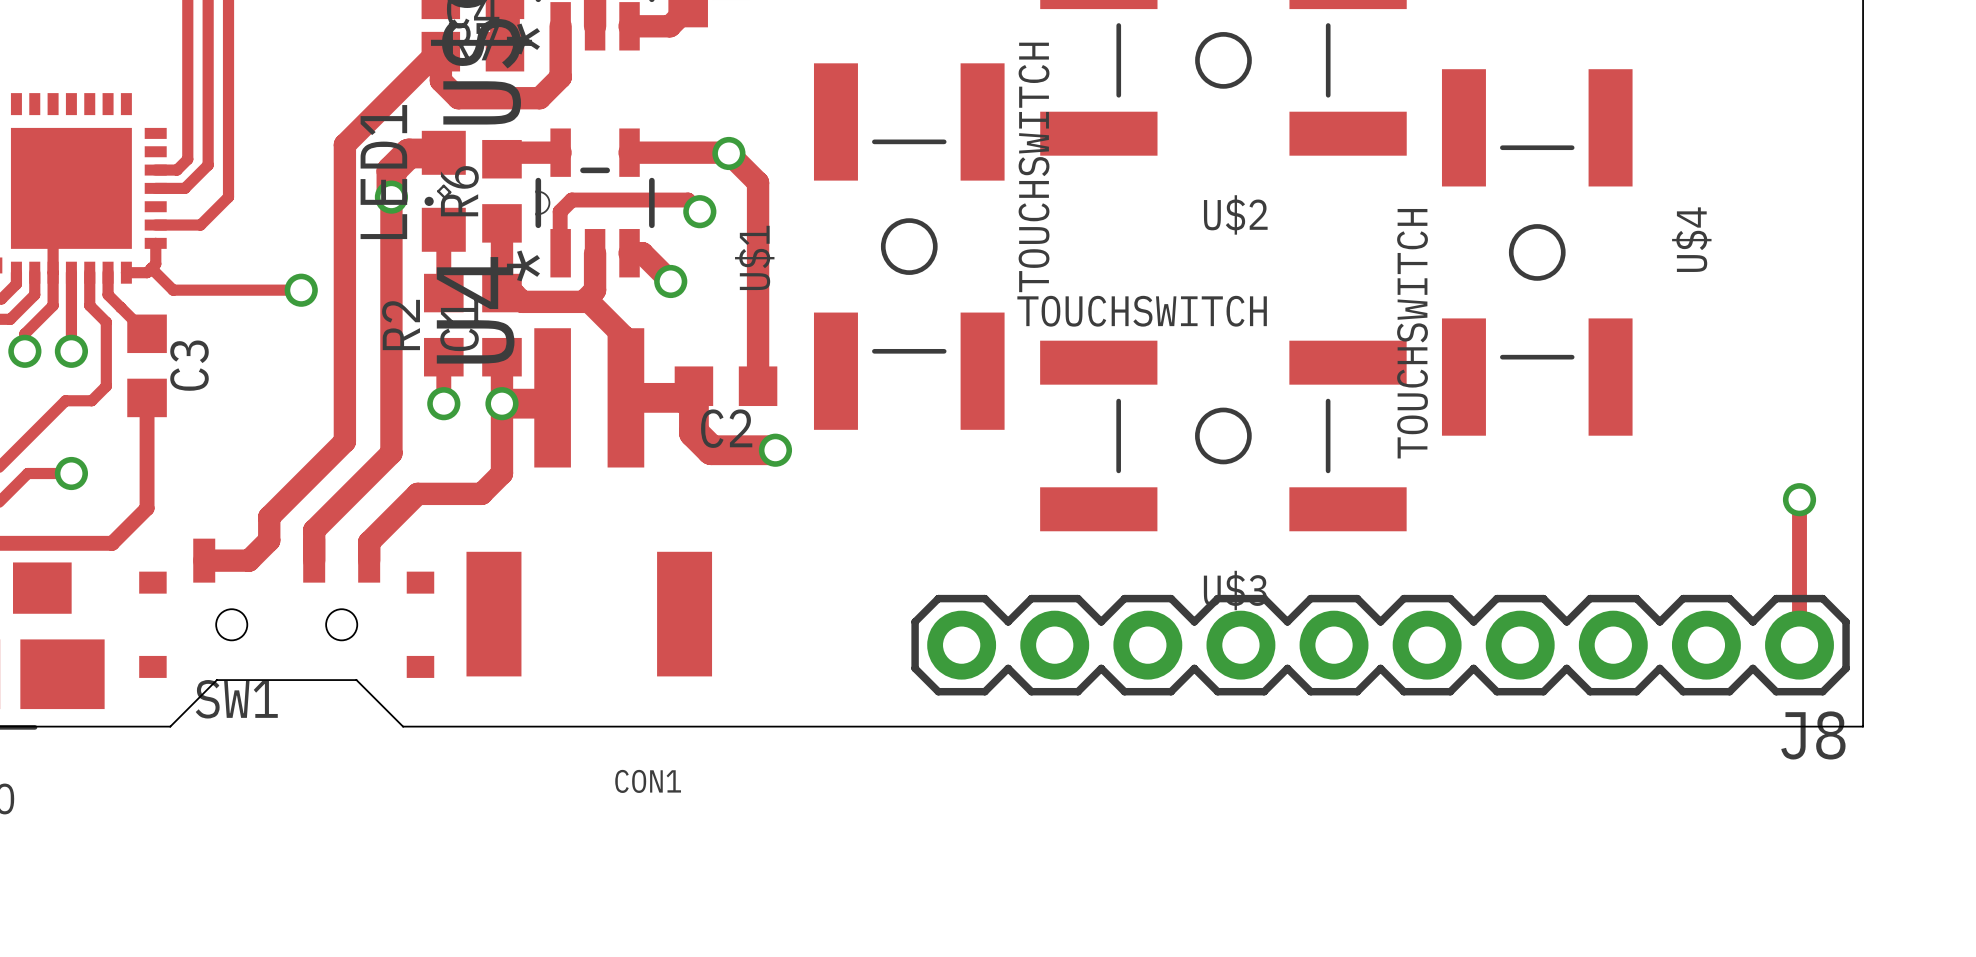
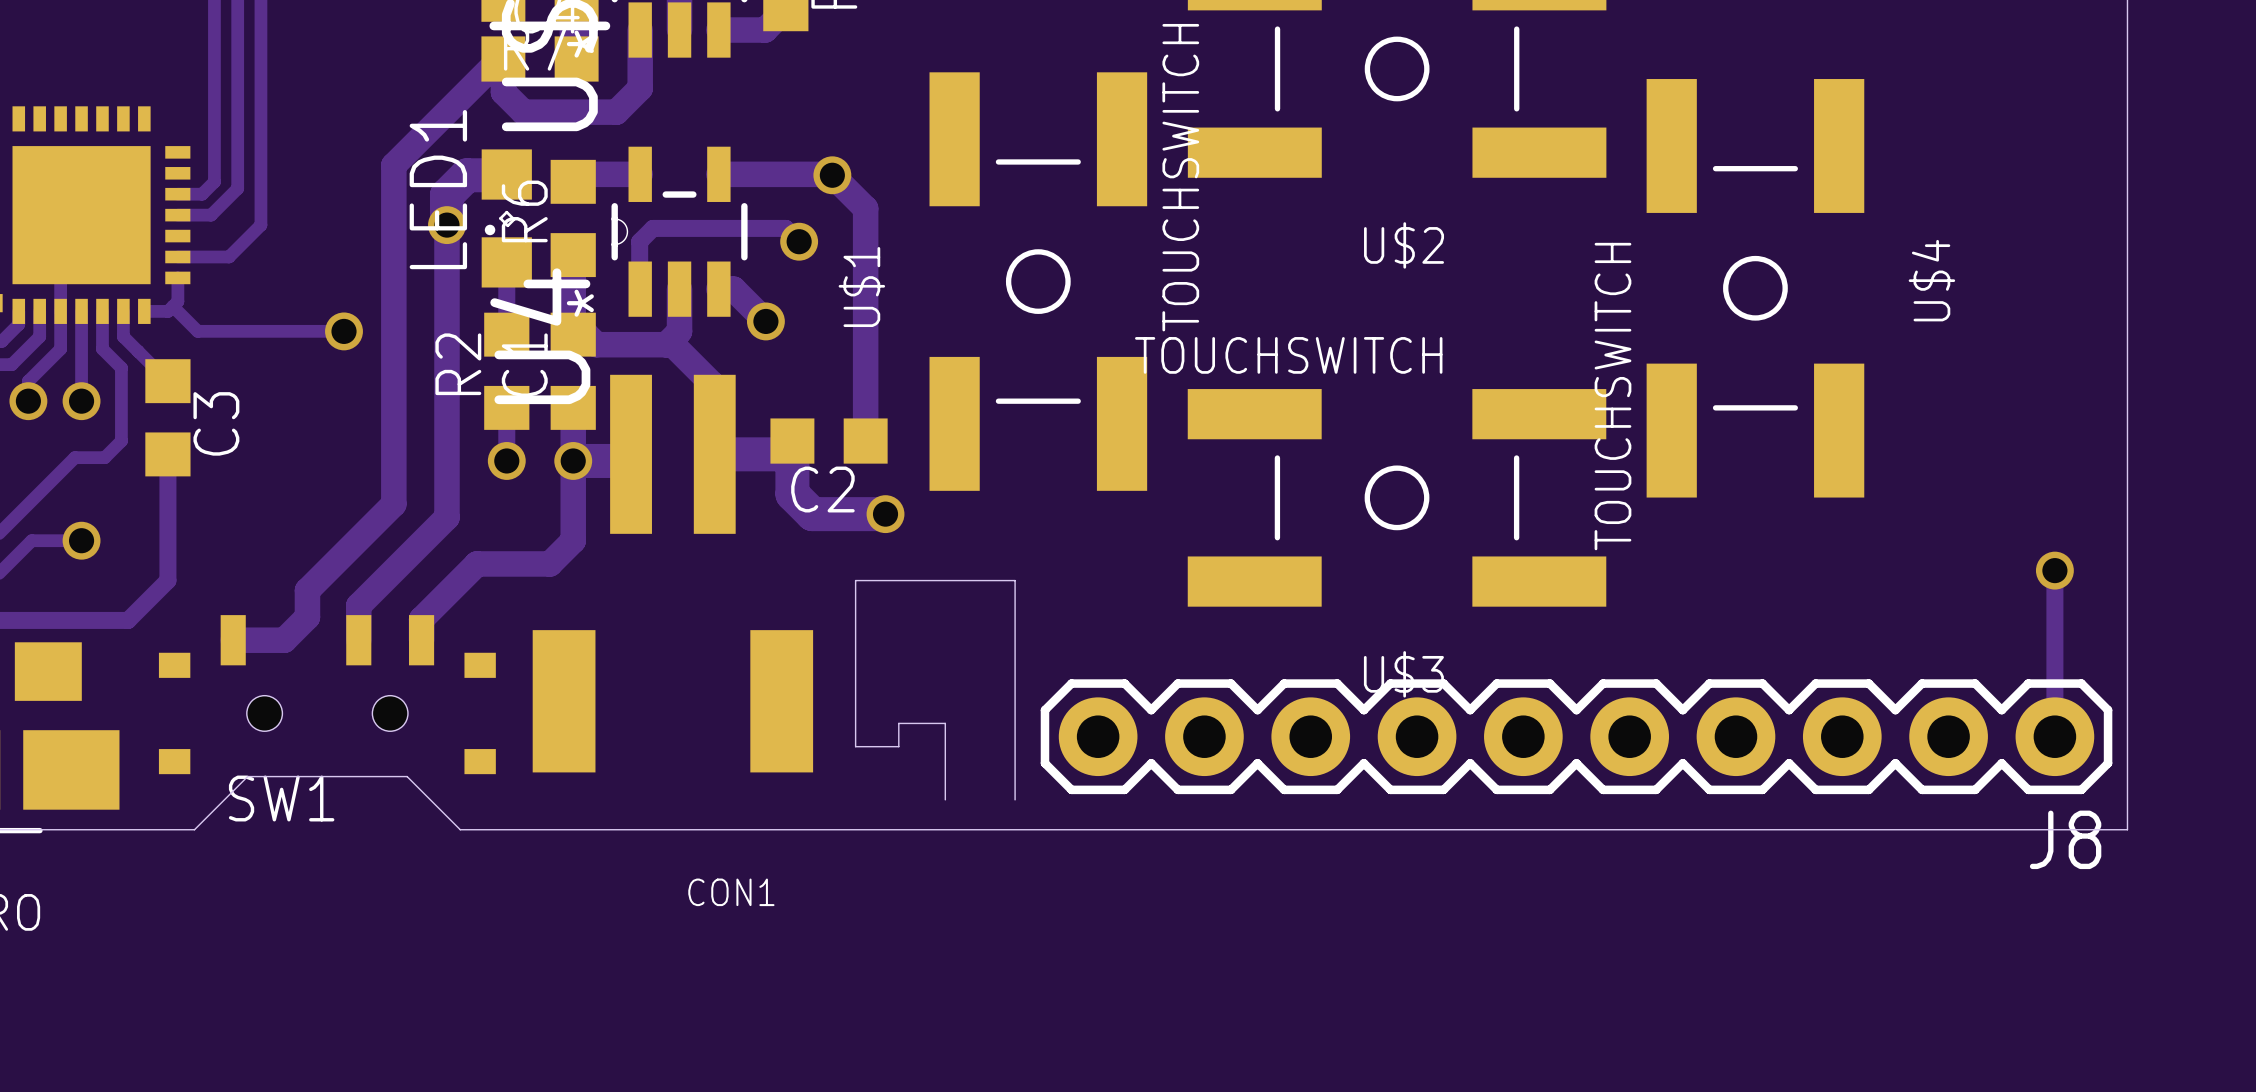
board edge: none -> (945, 799) (945, 723) (898, 723) (898, 746) (855, 746) (855, 580) (1015, 580) (1015, 799)

